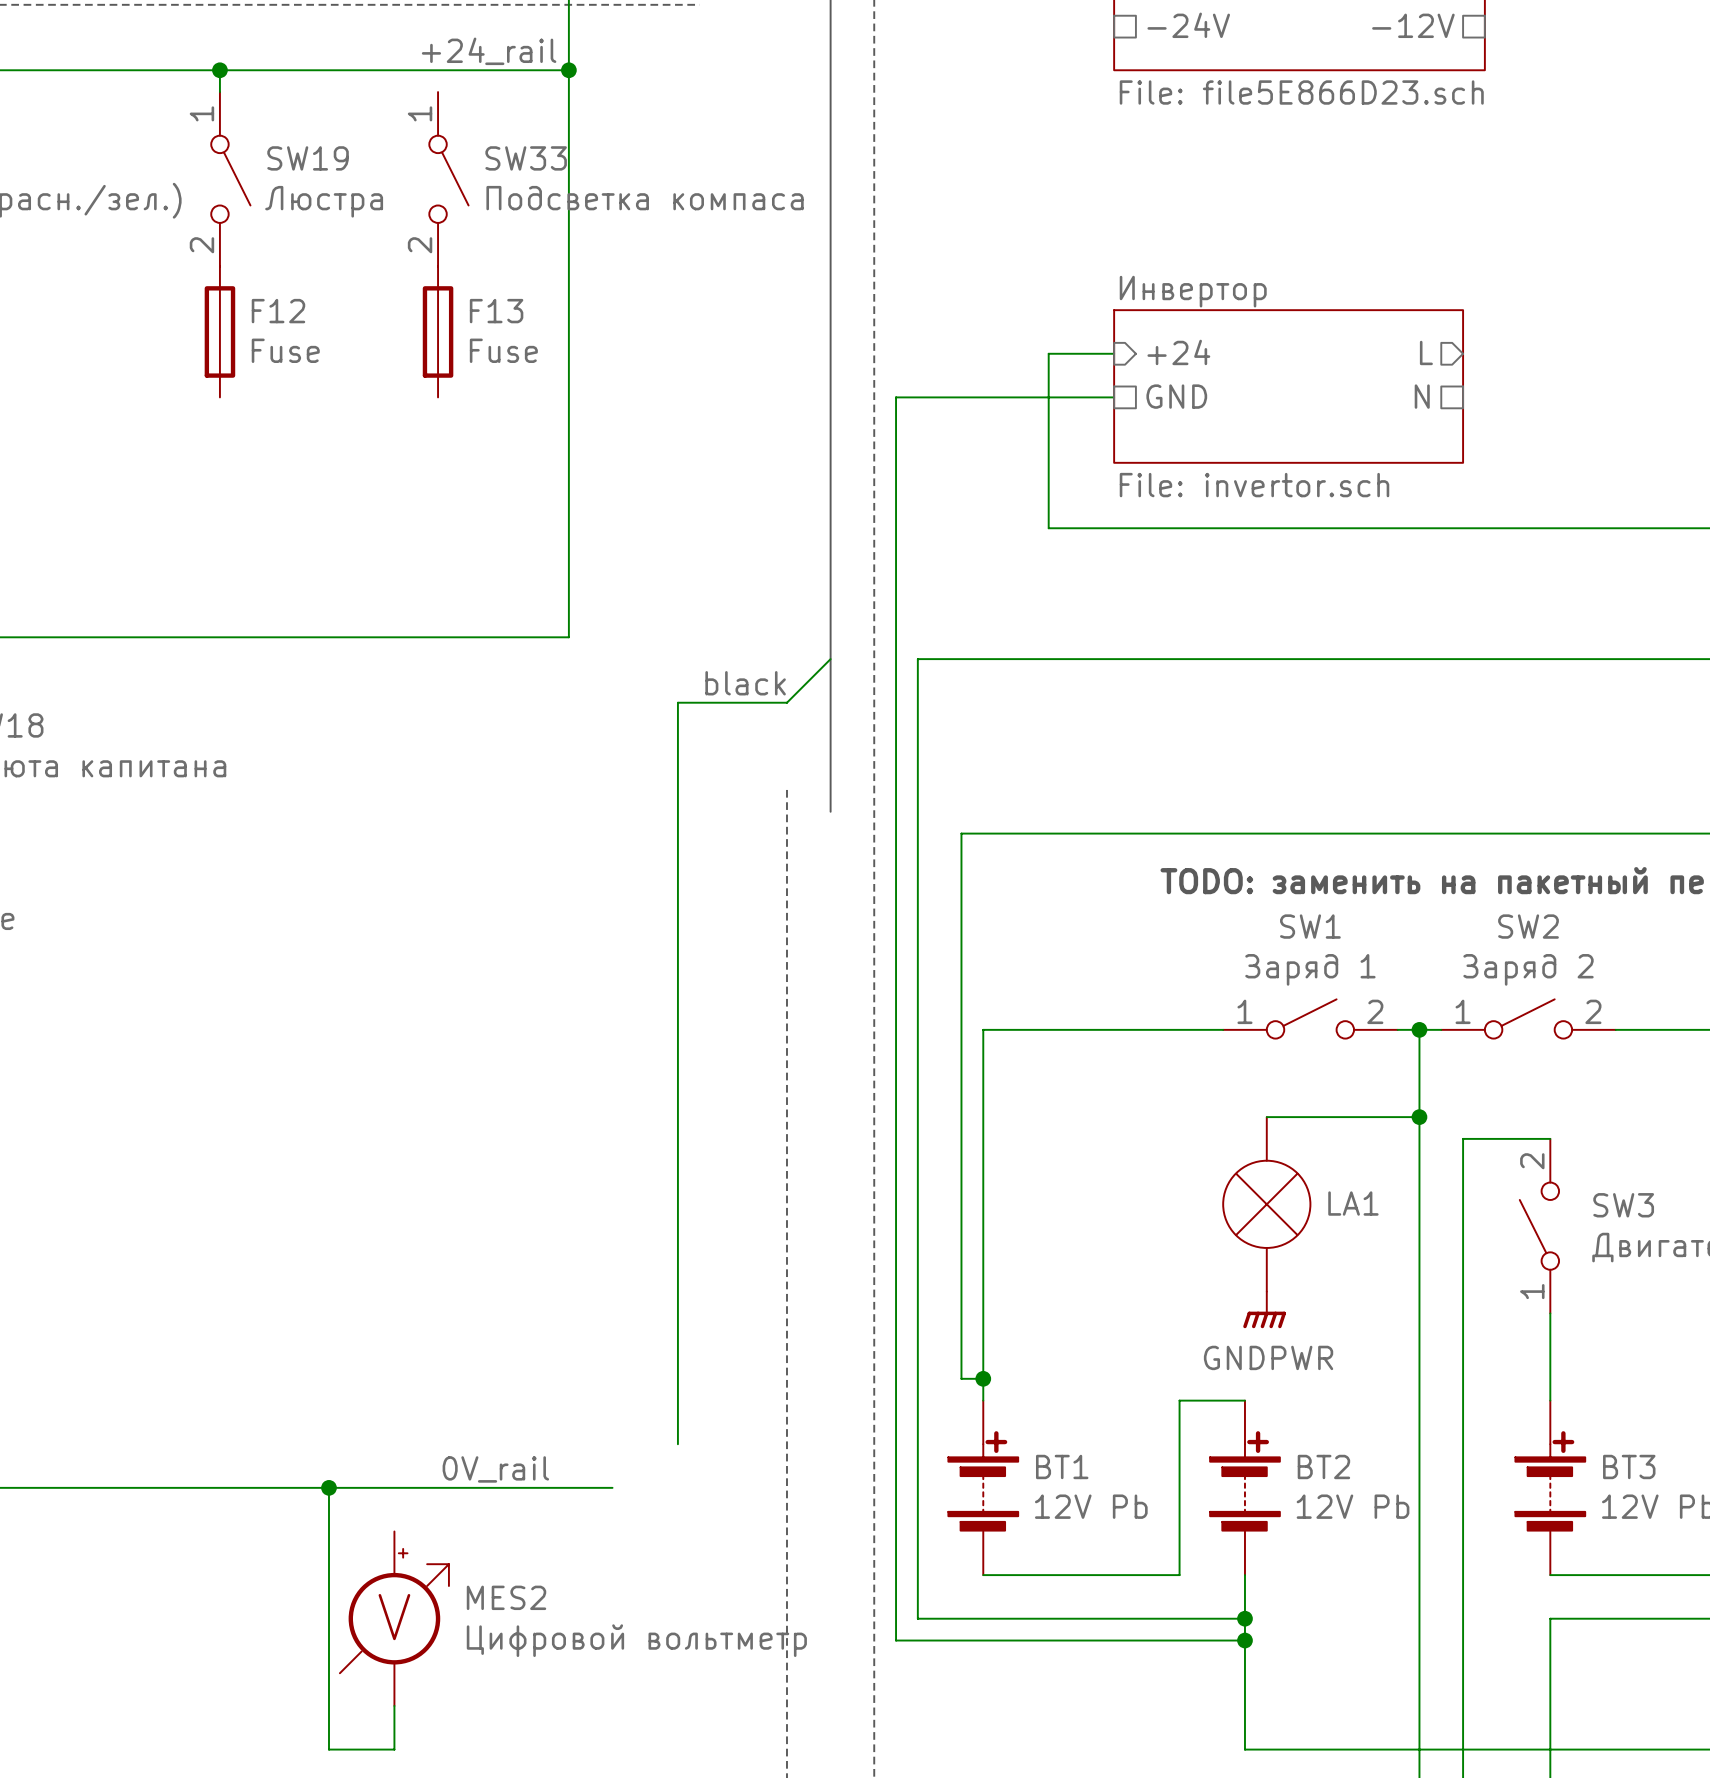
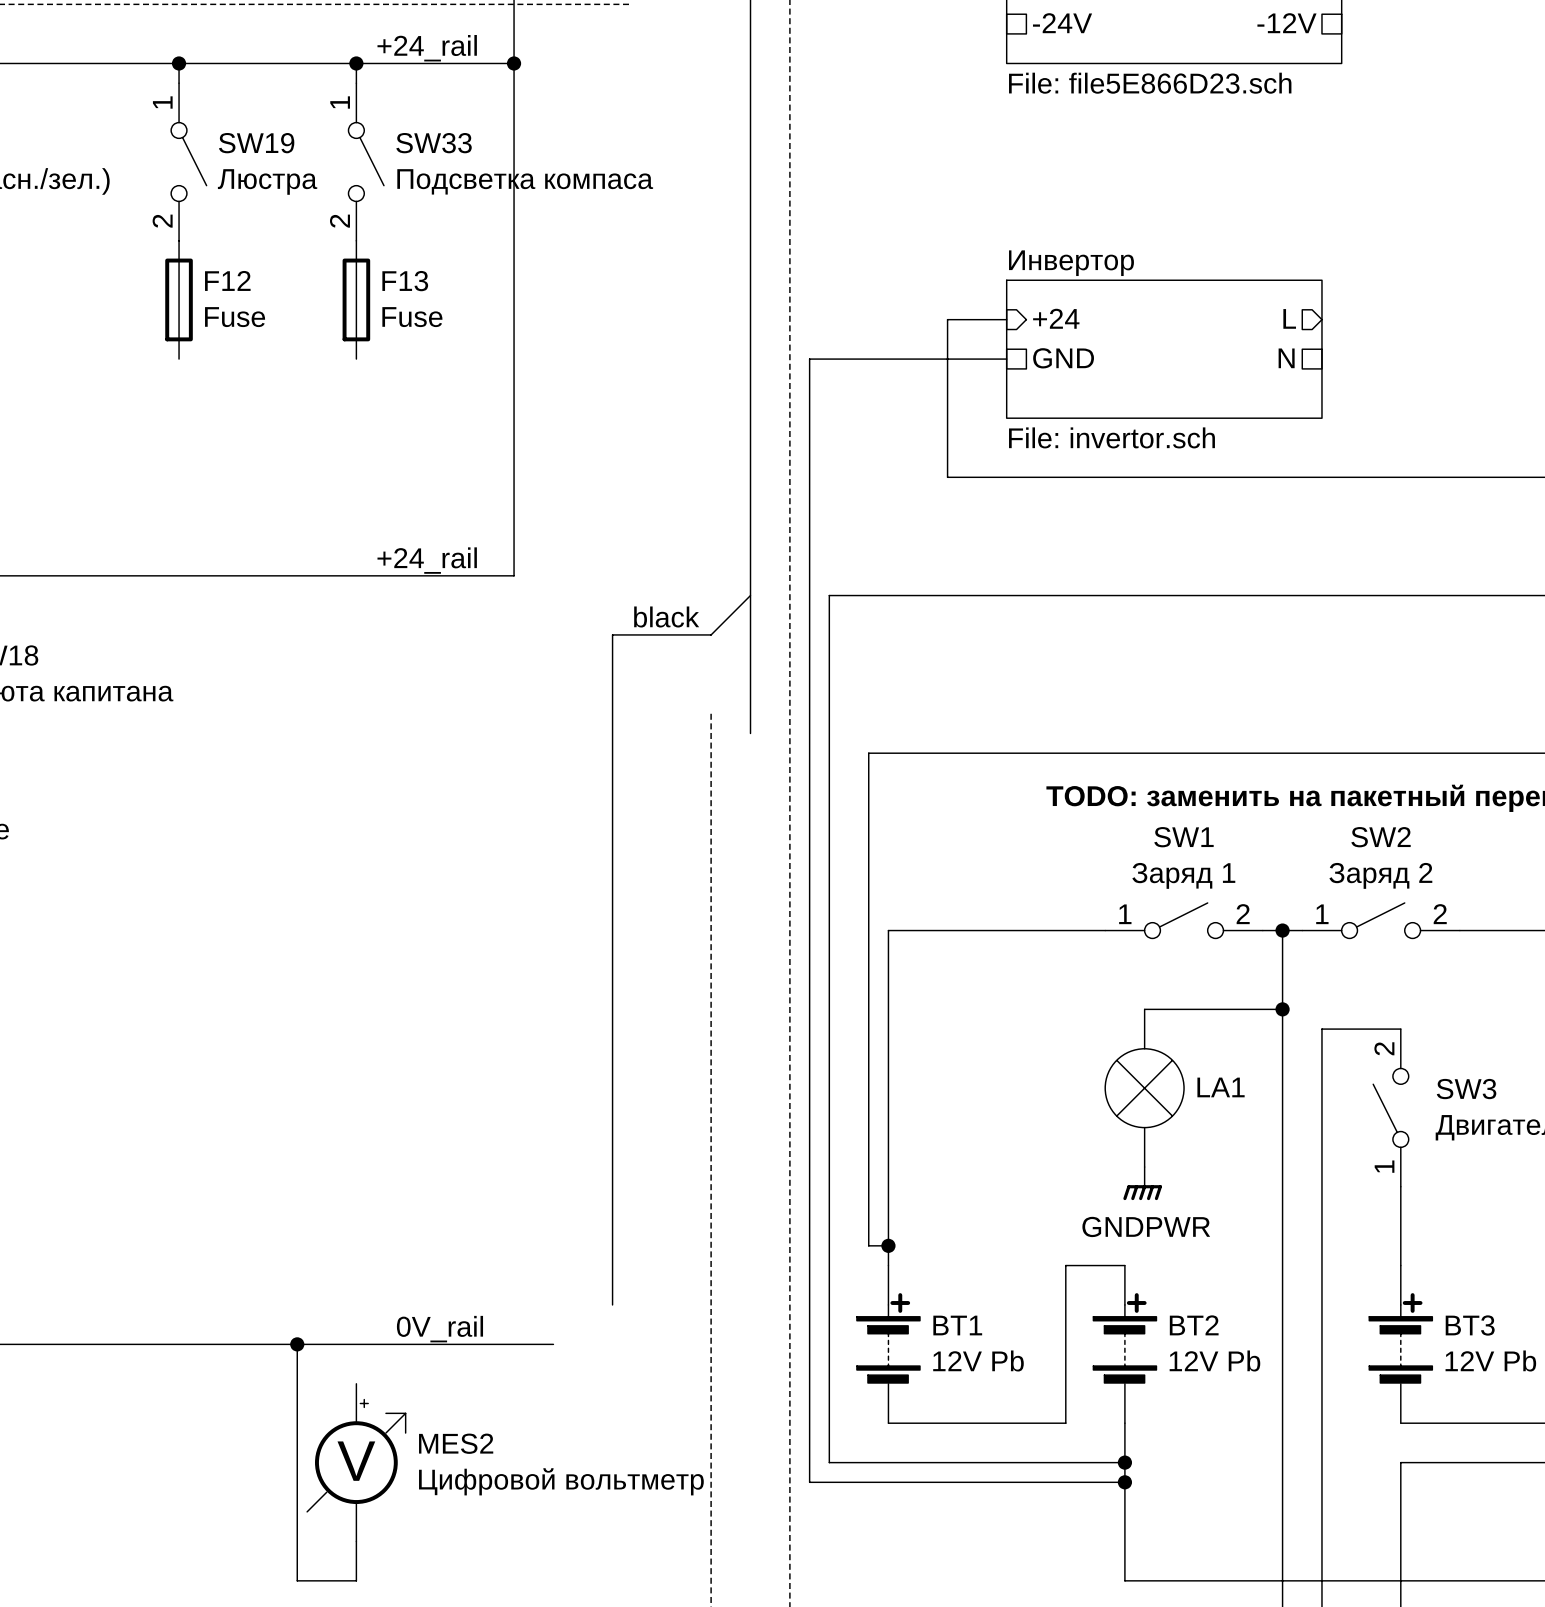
wire: (219, 70) (219, 92) -> (179, 63) (179, 83)
junction position: (219, 70) -> (179, 63)
wire: none -> (356, 63) (356, 83)
junction: none -> (356, 63)
SW19 position: (230, 179) -> (188, 162)
SW33 position: (448, 179) -> (366, 162)
F12 position: (219, 331) -> (179, 299)
F13 position: (438, 331) -> (356, 299)
label: none -> +24_rail (427, 560)

